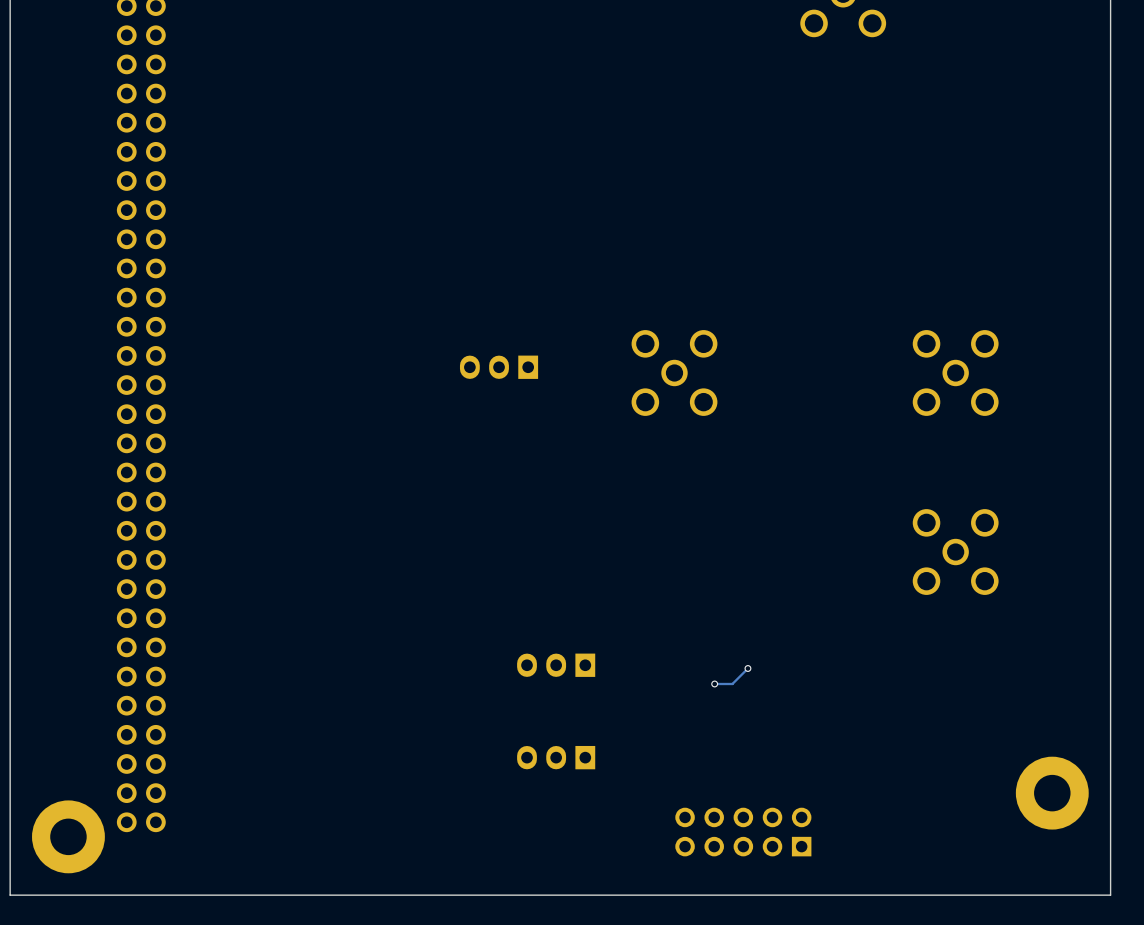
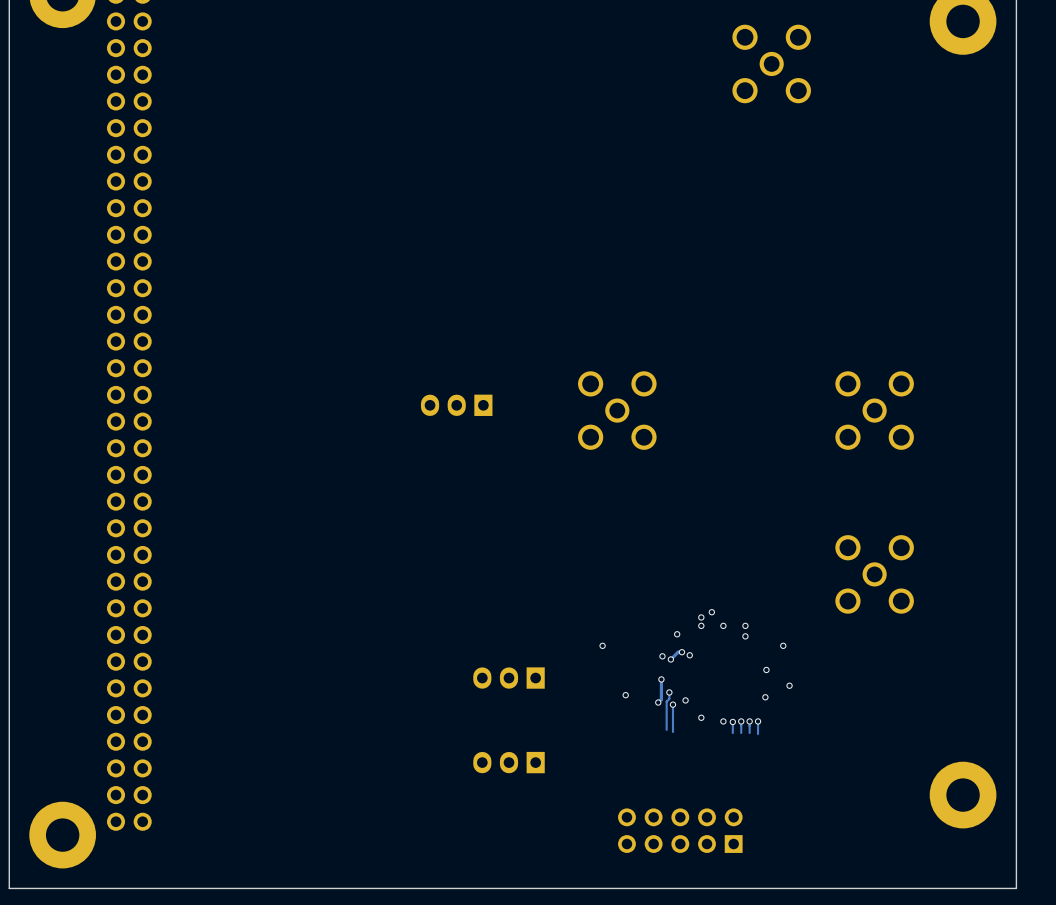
via: none -> (711, 612)
via: none -> (701, 617)
via: none -> (701, 625)
via: none -> (723, 625)
via: none -> (745, 625)
via: none -> (677, 634)
via: none -> (745, 636)
via: none -> (602, 645)
via: none -> (783, 645)
track: none -> (681, 652) (678, 652) (670, 659)
via: none -> (681, 652)
via: none -> (689, 655)
via: none -> (662, 656)
via: none -> (670, 659)
via: none -> (766, 669)
track: none -> (661, 679) (661, 699) (658, 702)
via: none -> (661, 679)
track: (747, 668) (732, 683) (714, 683) -> none
via: (747, 668) -> none
via: none -> (789, 685)
track: none -> (669, 692) (669, 698) (666, 701) (666, 729)
via: none -> (669, 692)
via: none -> (625, 695)
via: (714, 683) -> none
via: none -> (765, 697)
via: none -> (685, 700)
via: none -> (658, 702)
track: none -> (672, 704) (672, 731)
via: none -> (672, 704)
via: none -> (701, 717)
via: none -> (723, 721)
track: none -> (741, 721) (741, 733)
via: none -> (741, 721)
track: none -> (749, 721) (749, 733)
via: none -> (749, 721)
track: none -> (758, 721) (758, 734)
via: none -> (758, 721)
track: none -> (732, 721) (732, 733)
via: none -> (732, 721)

